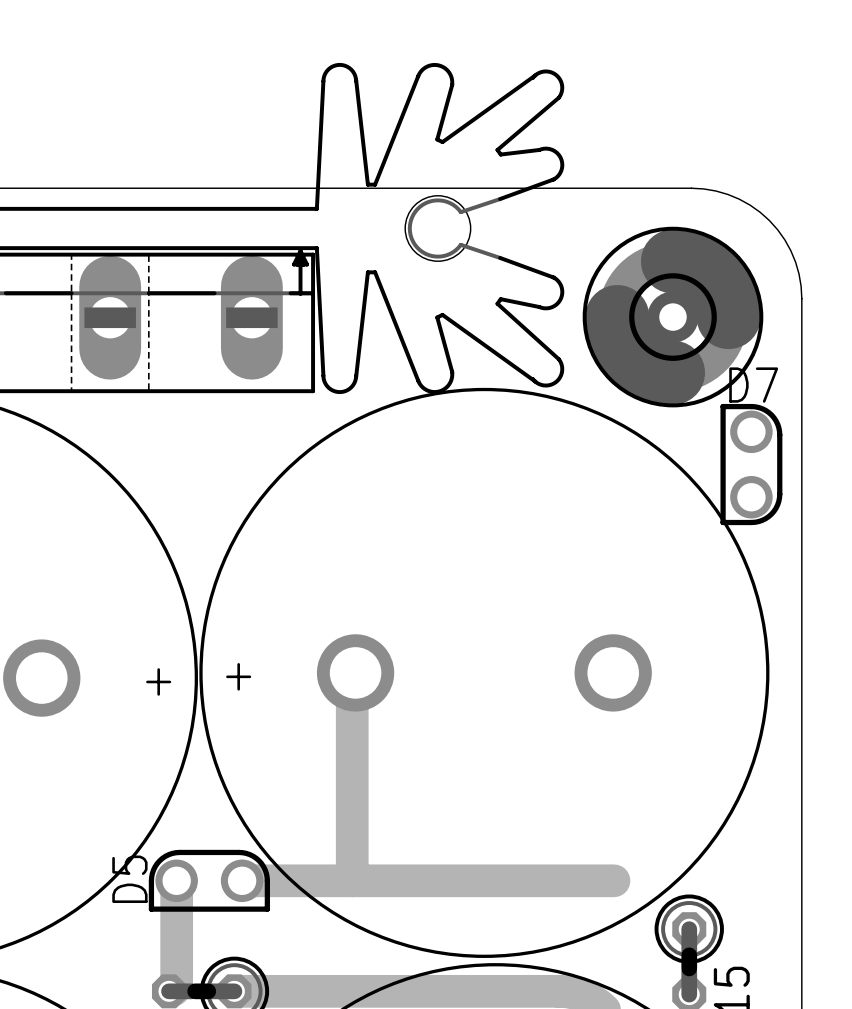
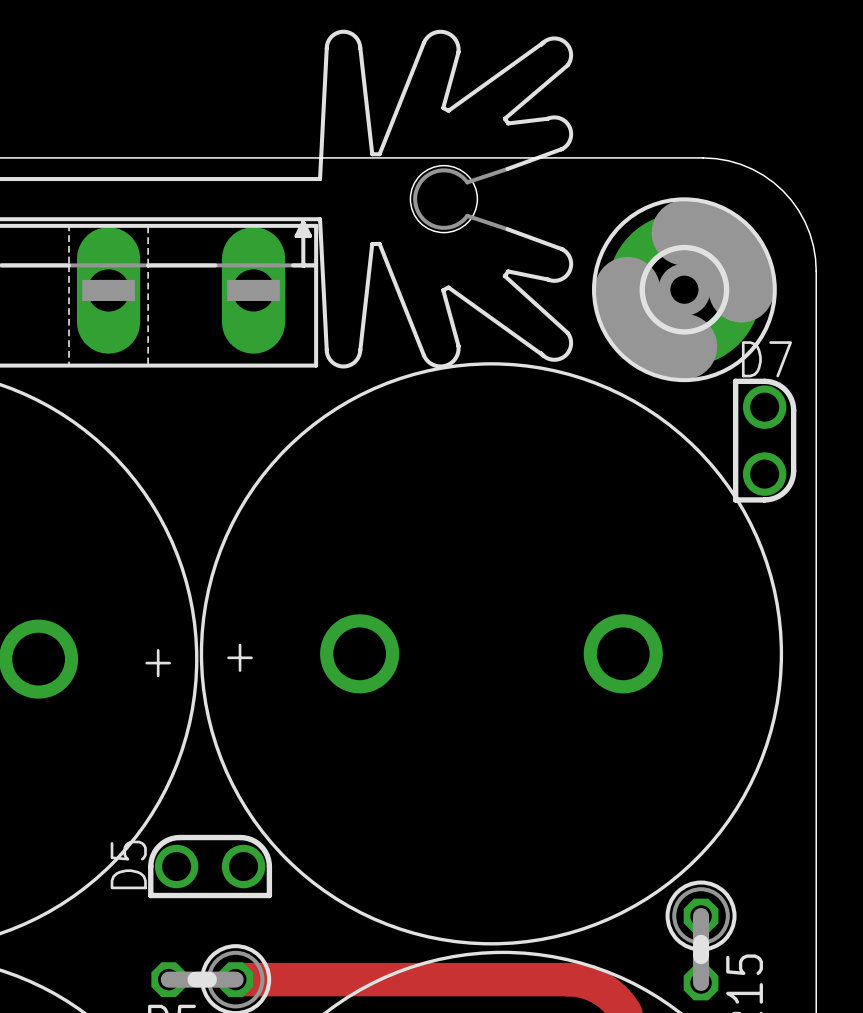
track: (355, 672) (352, 676) (352, 880) -> none
track: (176, 880) (176, 984) (173, 989) (169, 991) -> none
track: (242, 880) (614, 880) -> none

